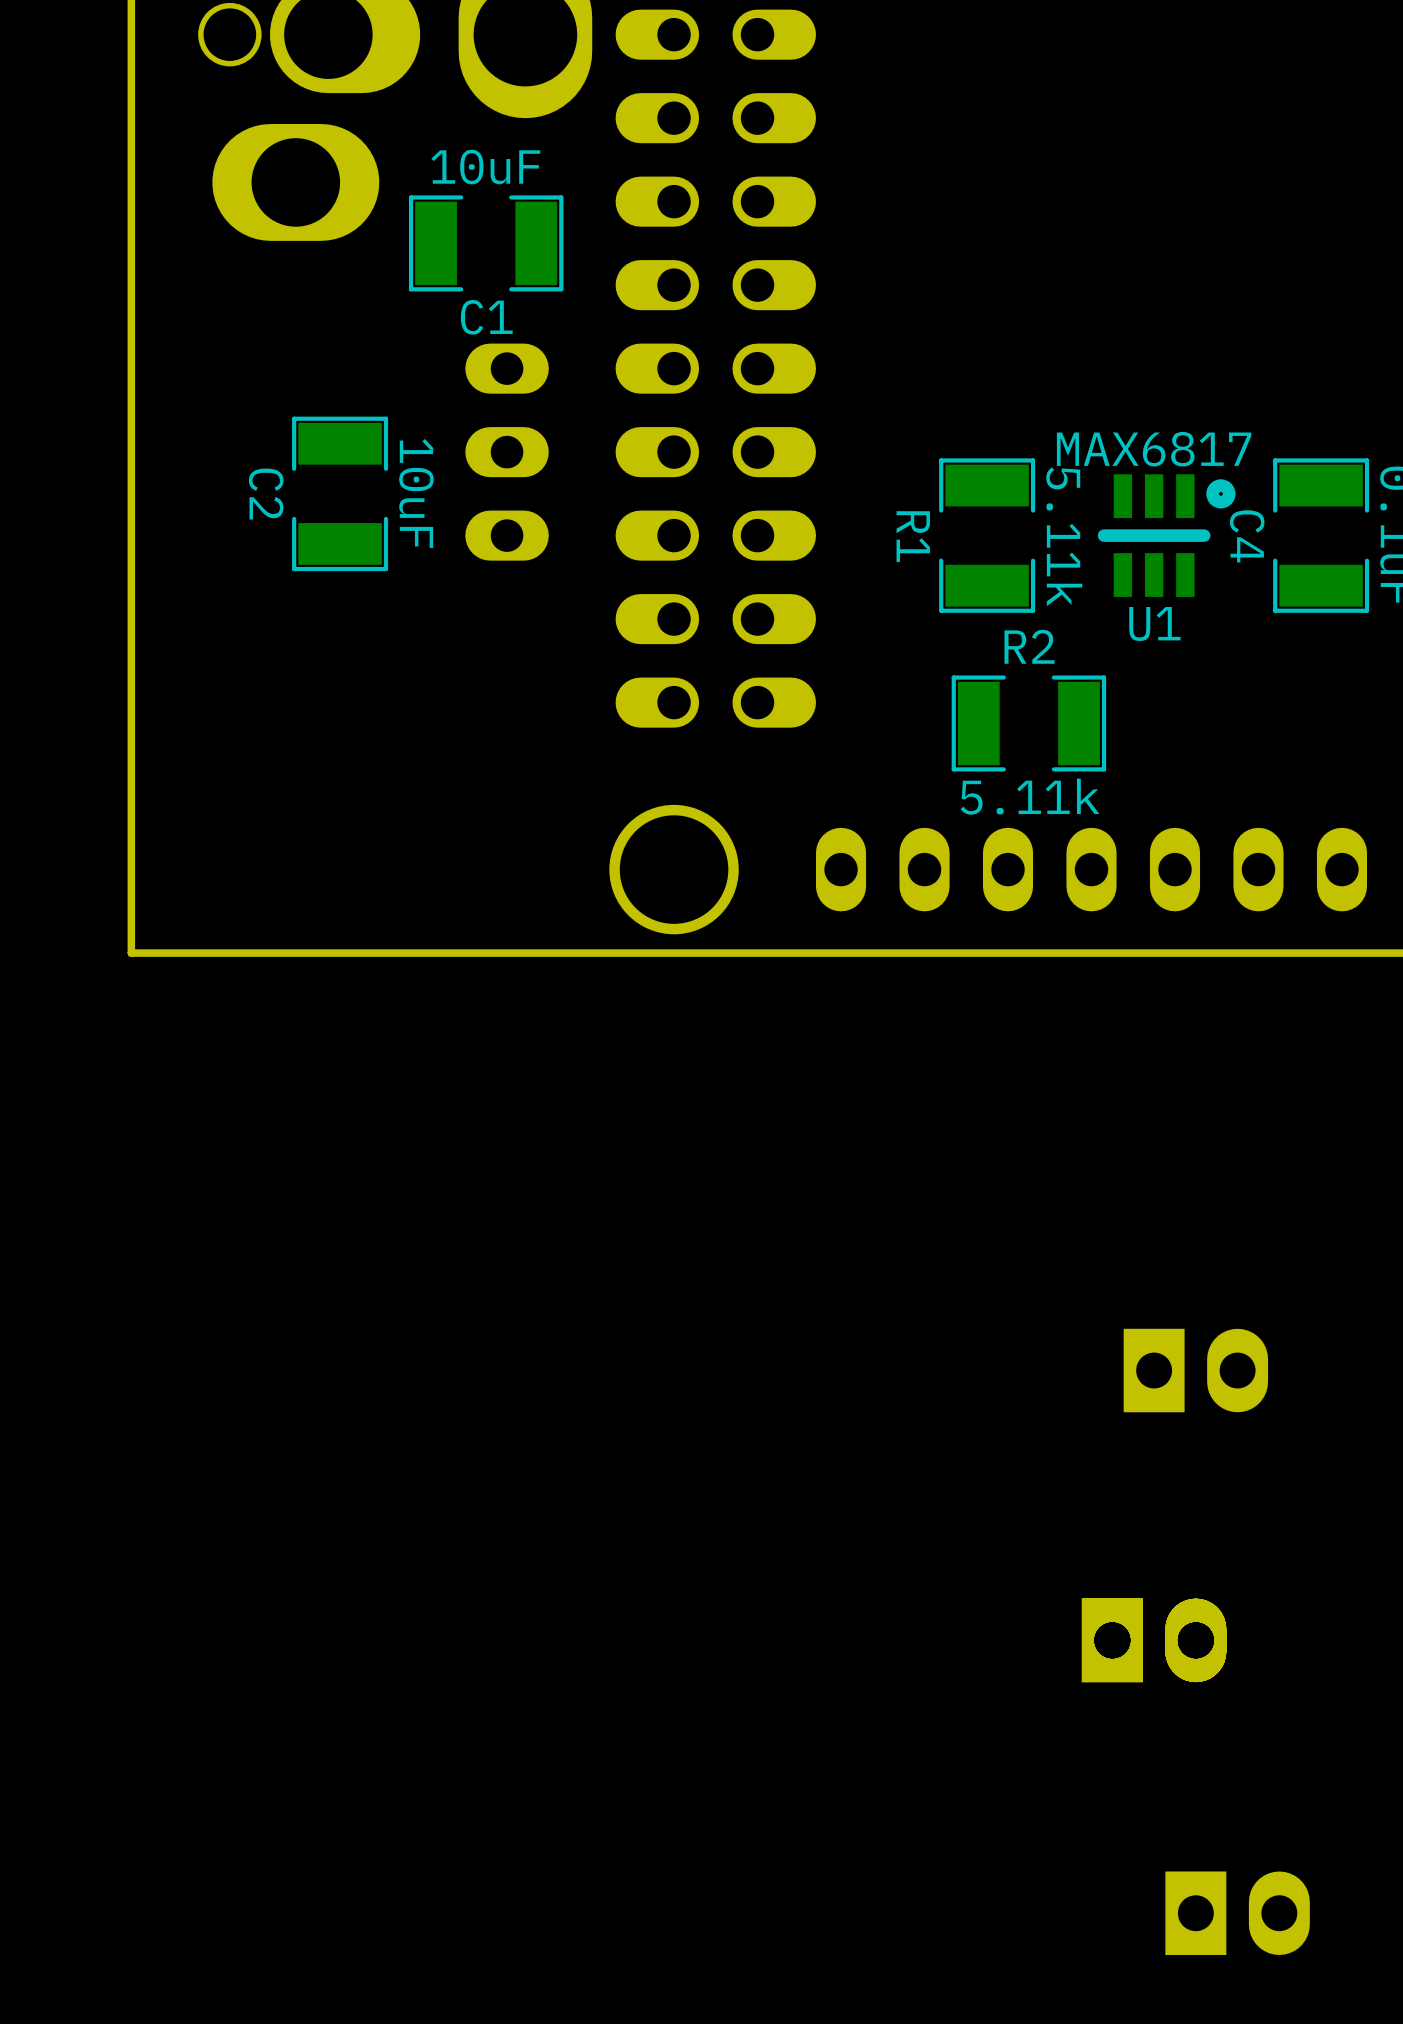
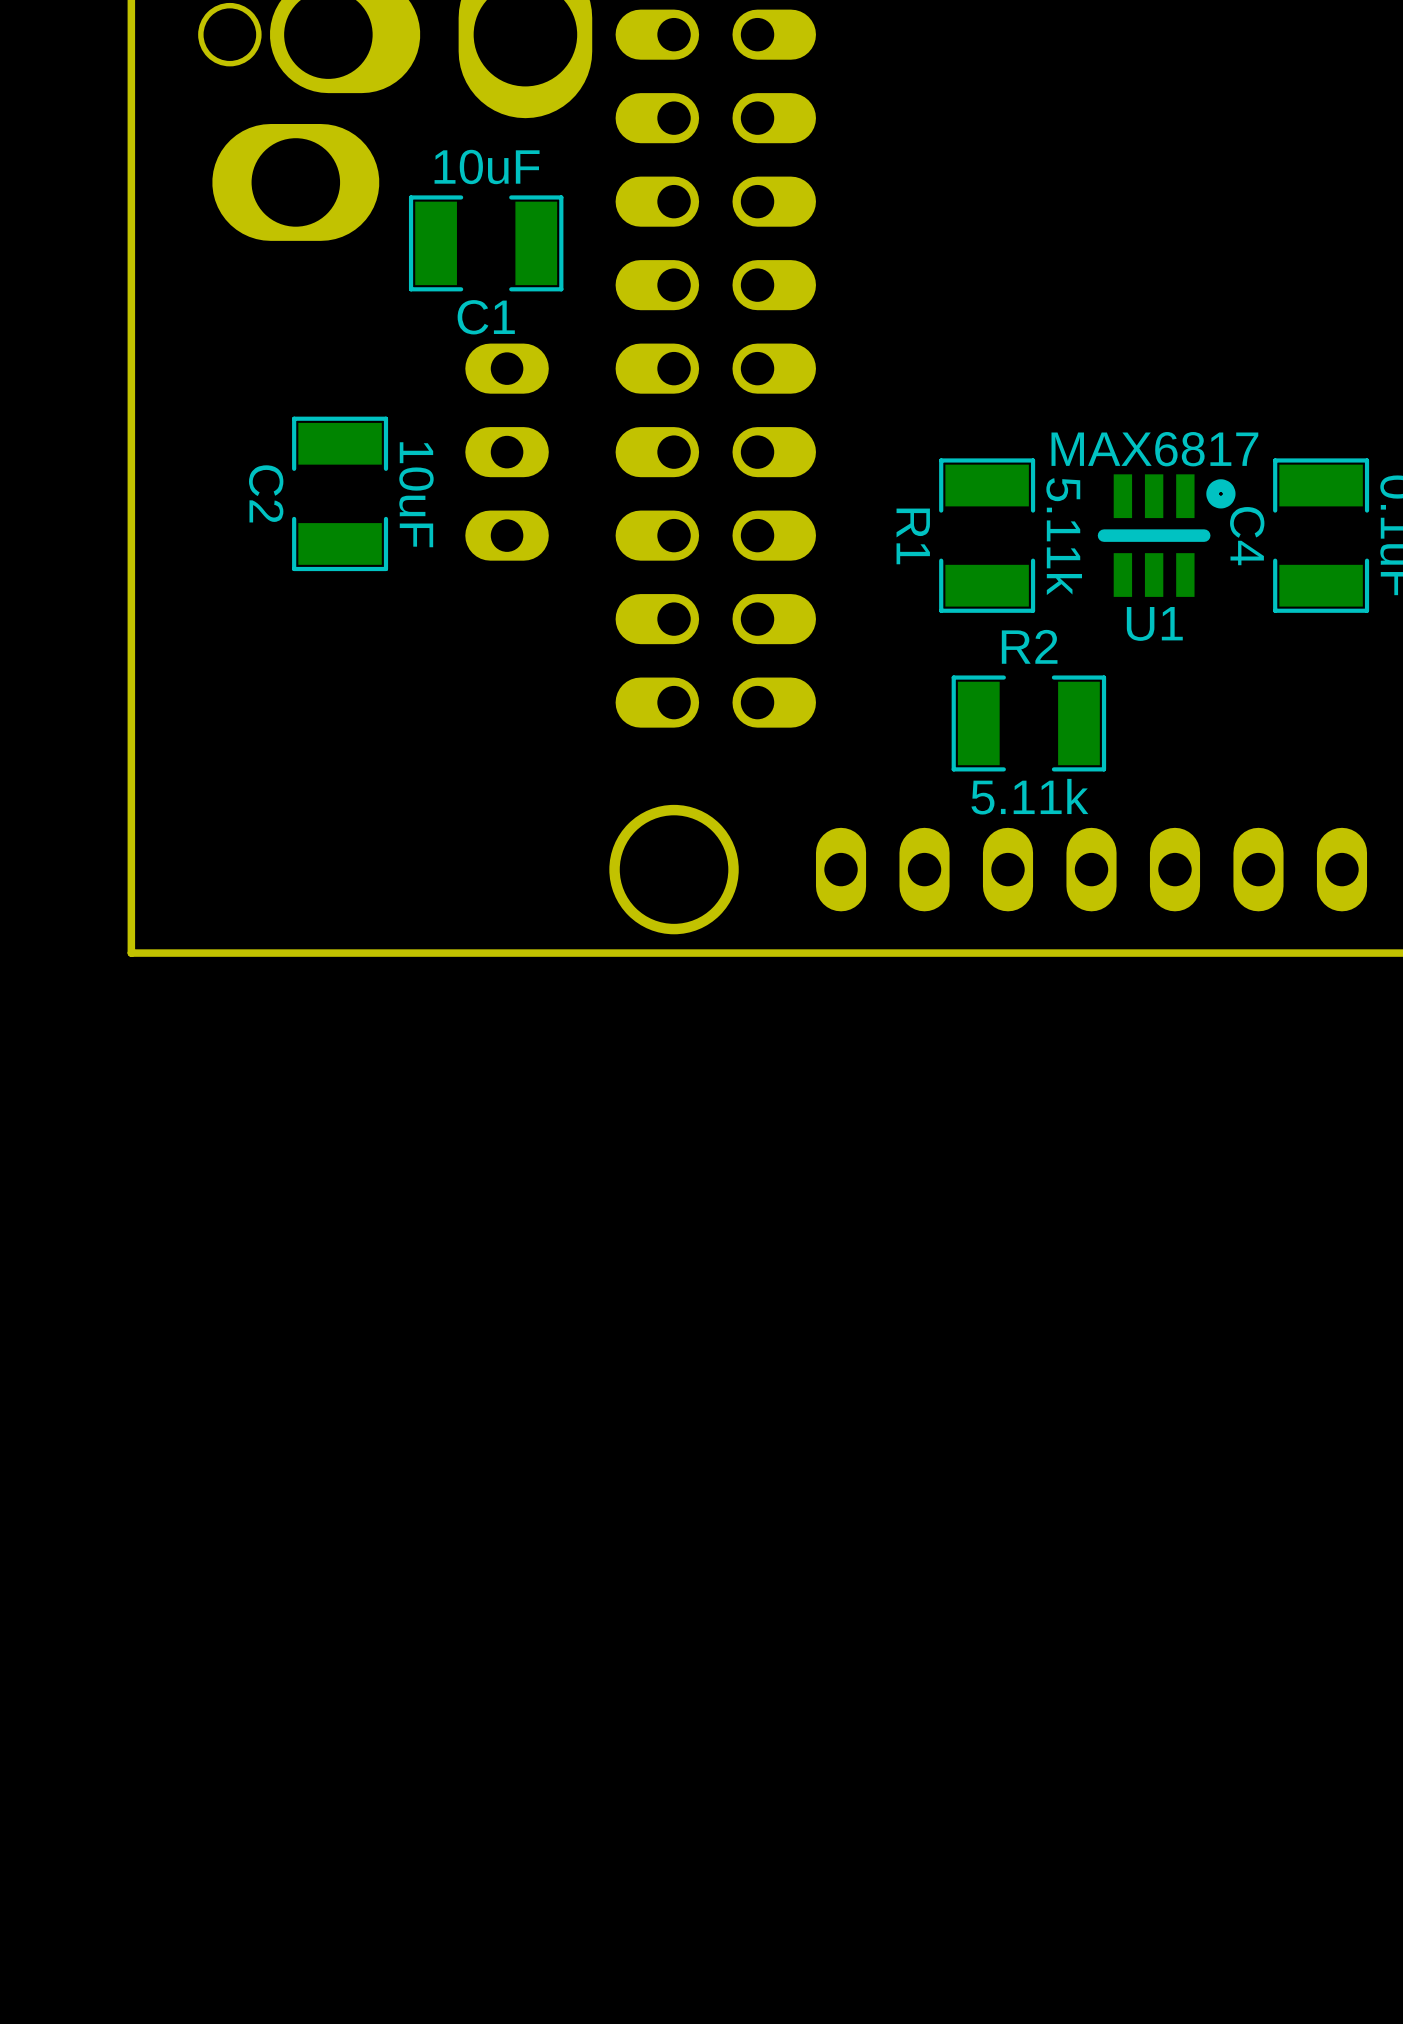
part: (1195, 1370) -> none
part: (1154, 1640) -> none
part: (1237, 1913) -> none

